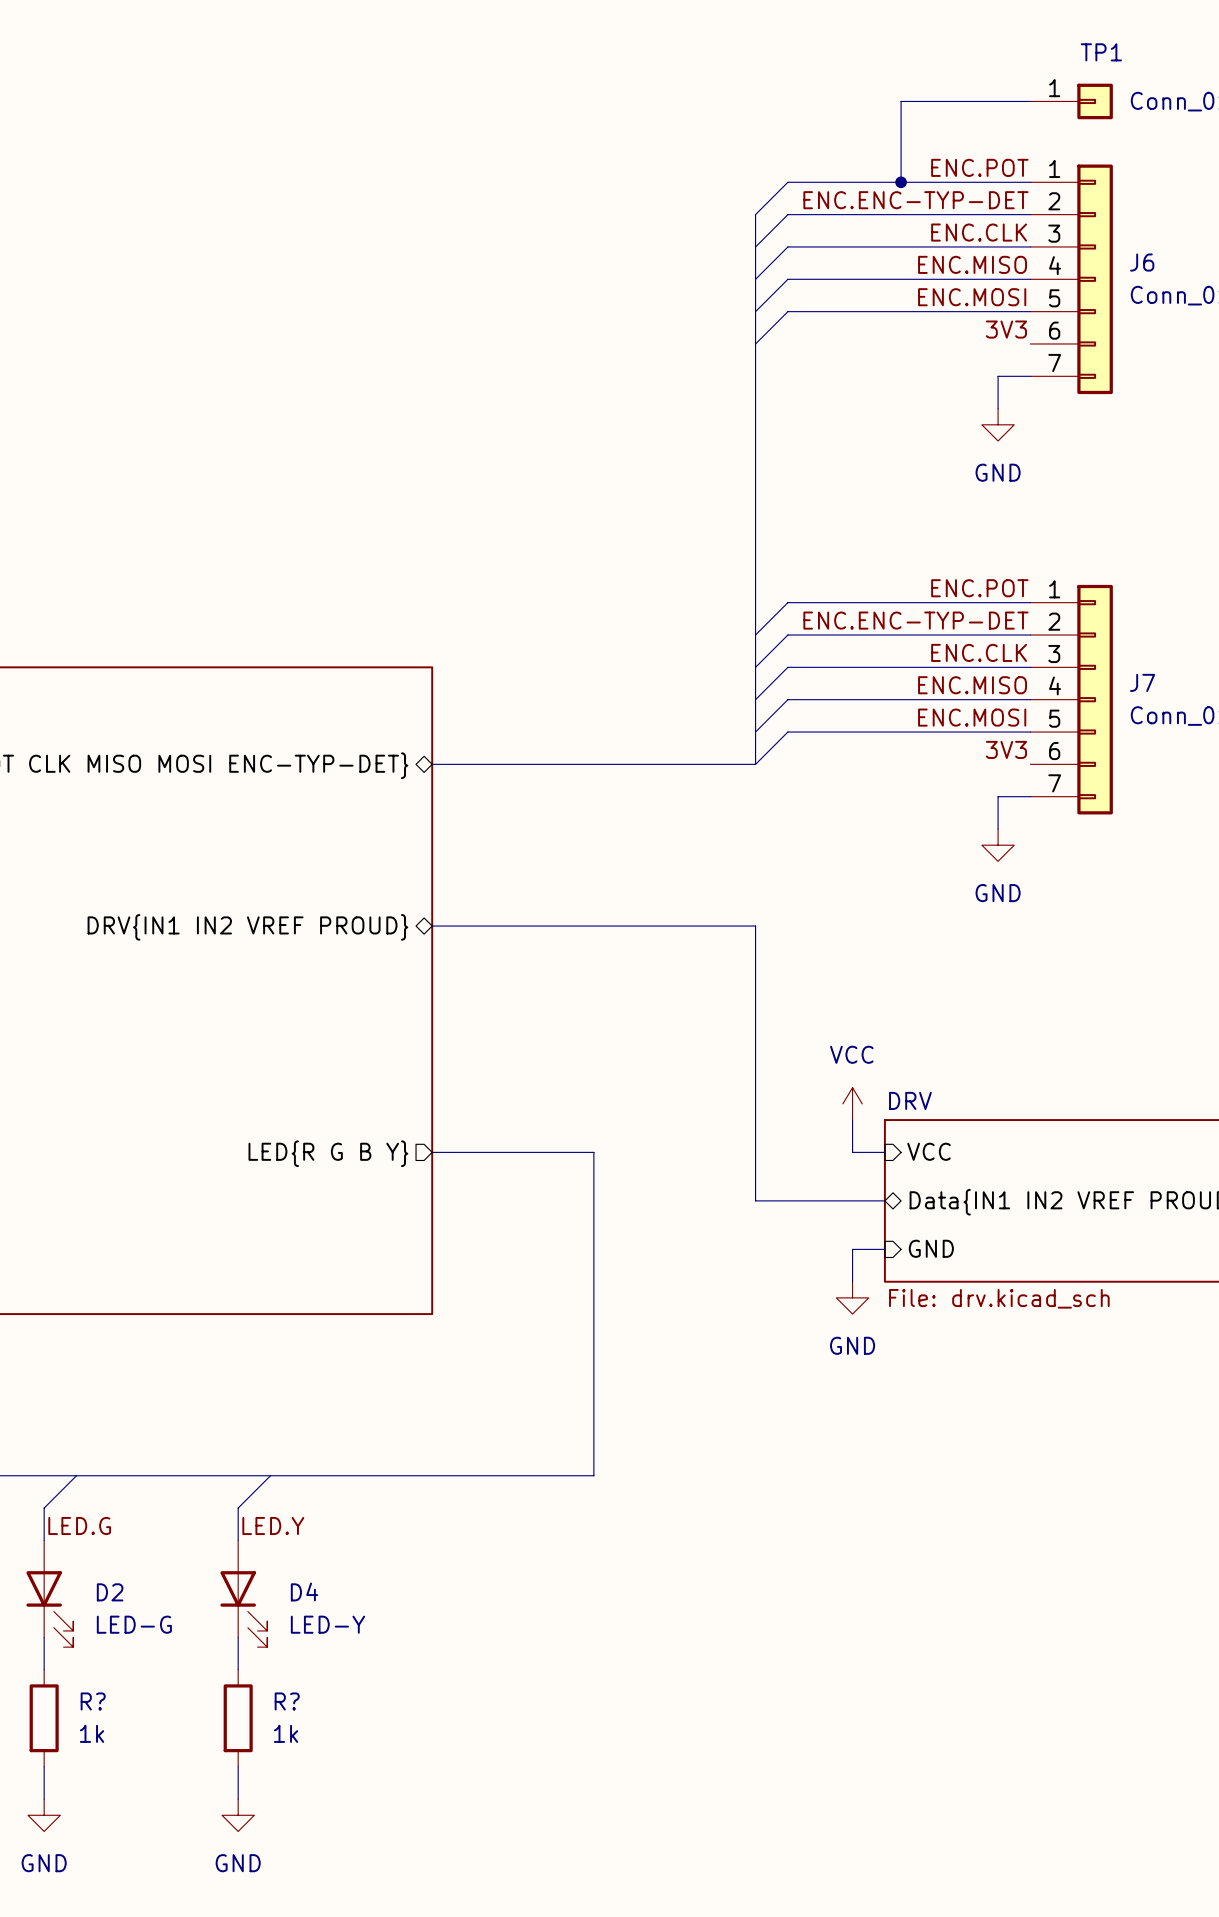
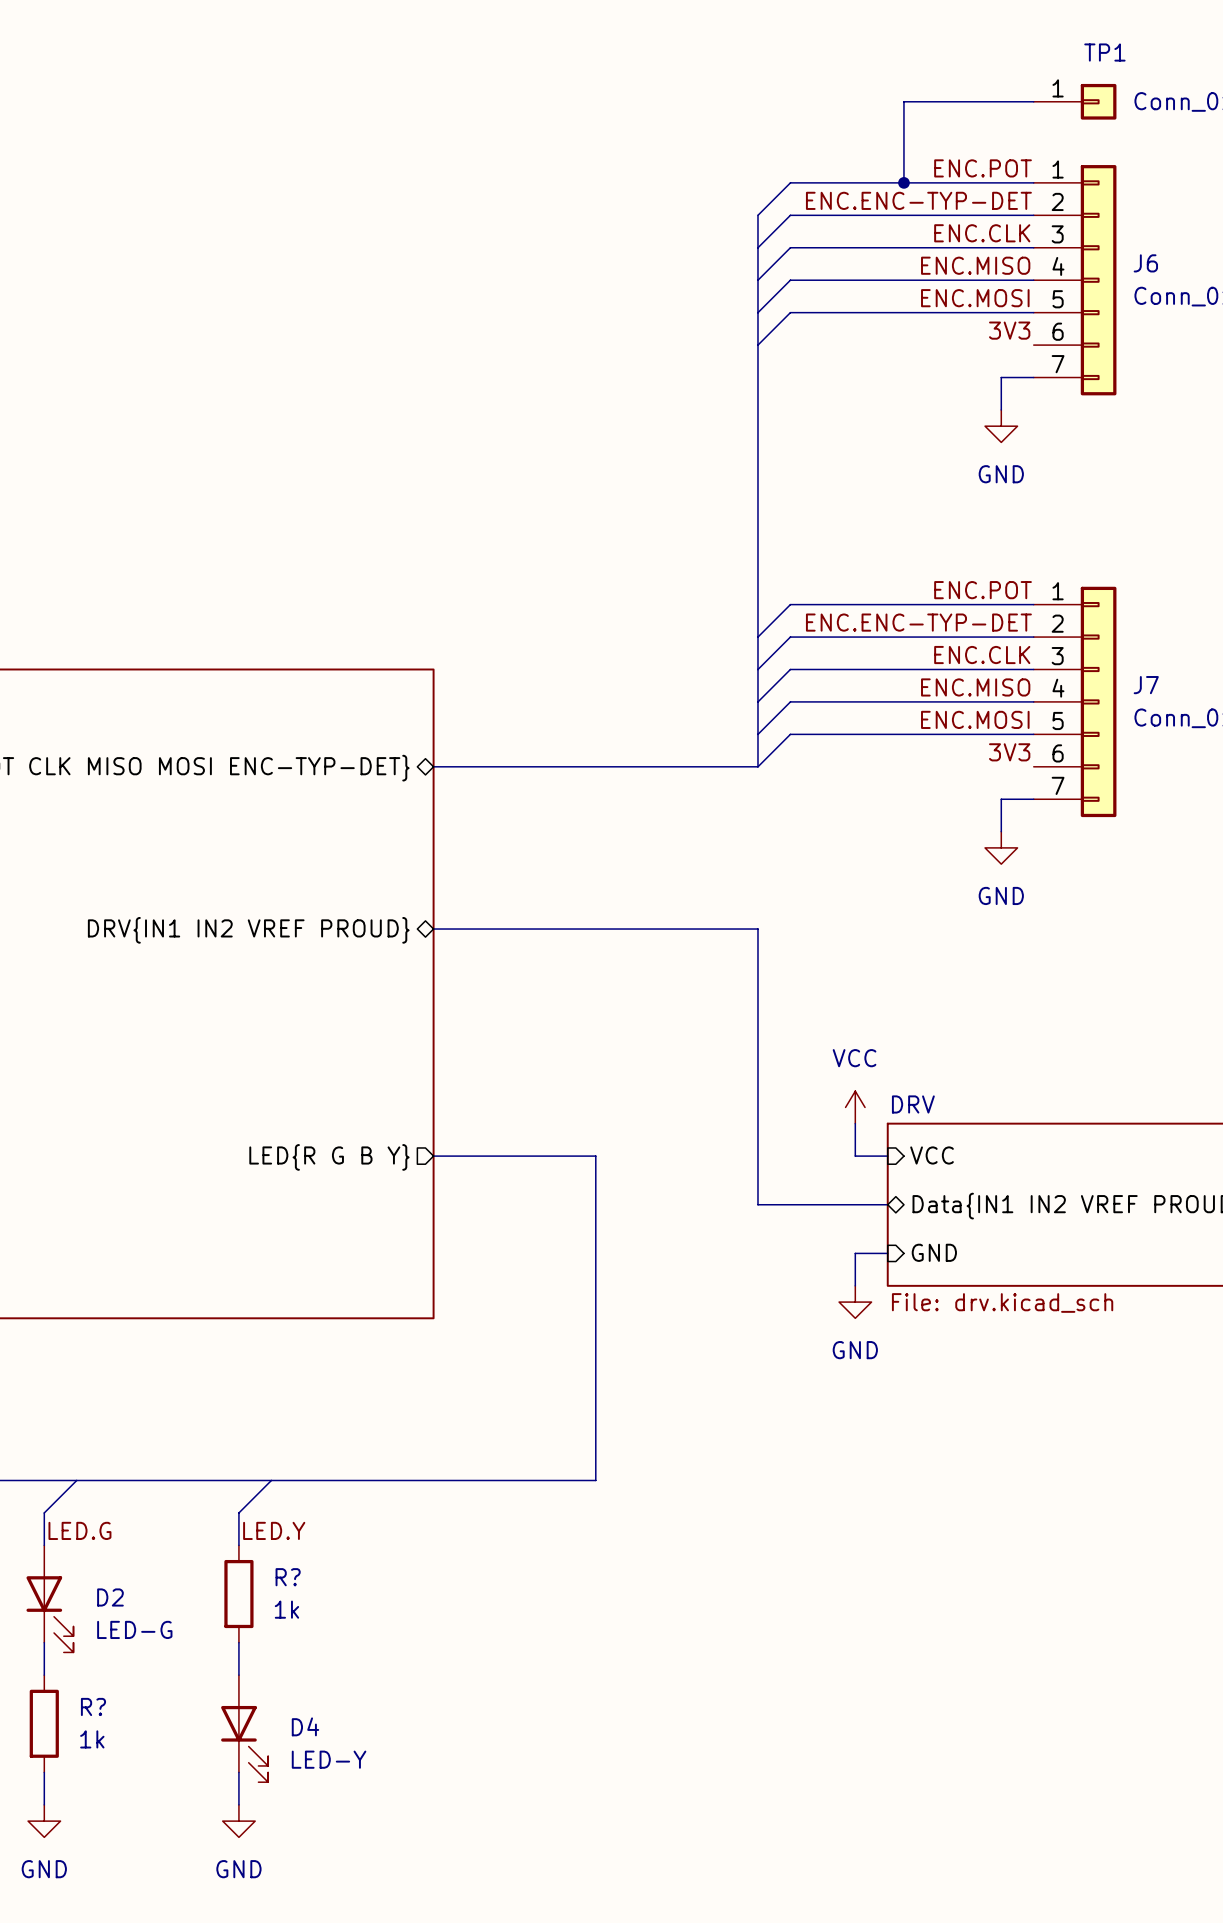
D4 position: (243, 1593) -> (244, 1728)
R? position: (238, 1718) -> (238, 1594)

